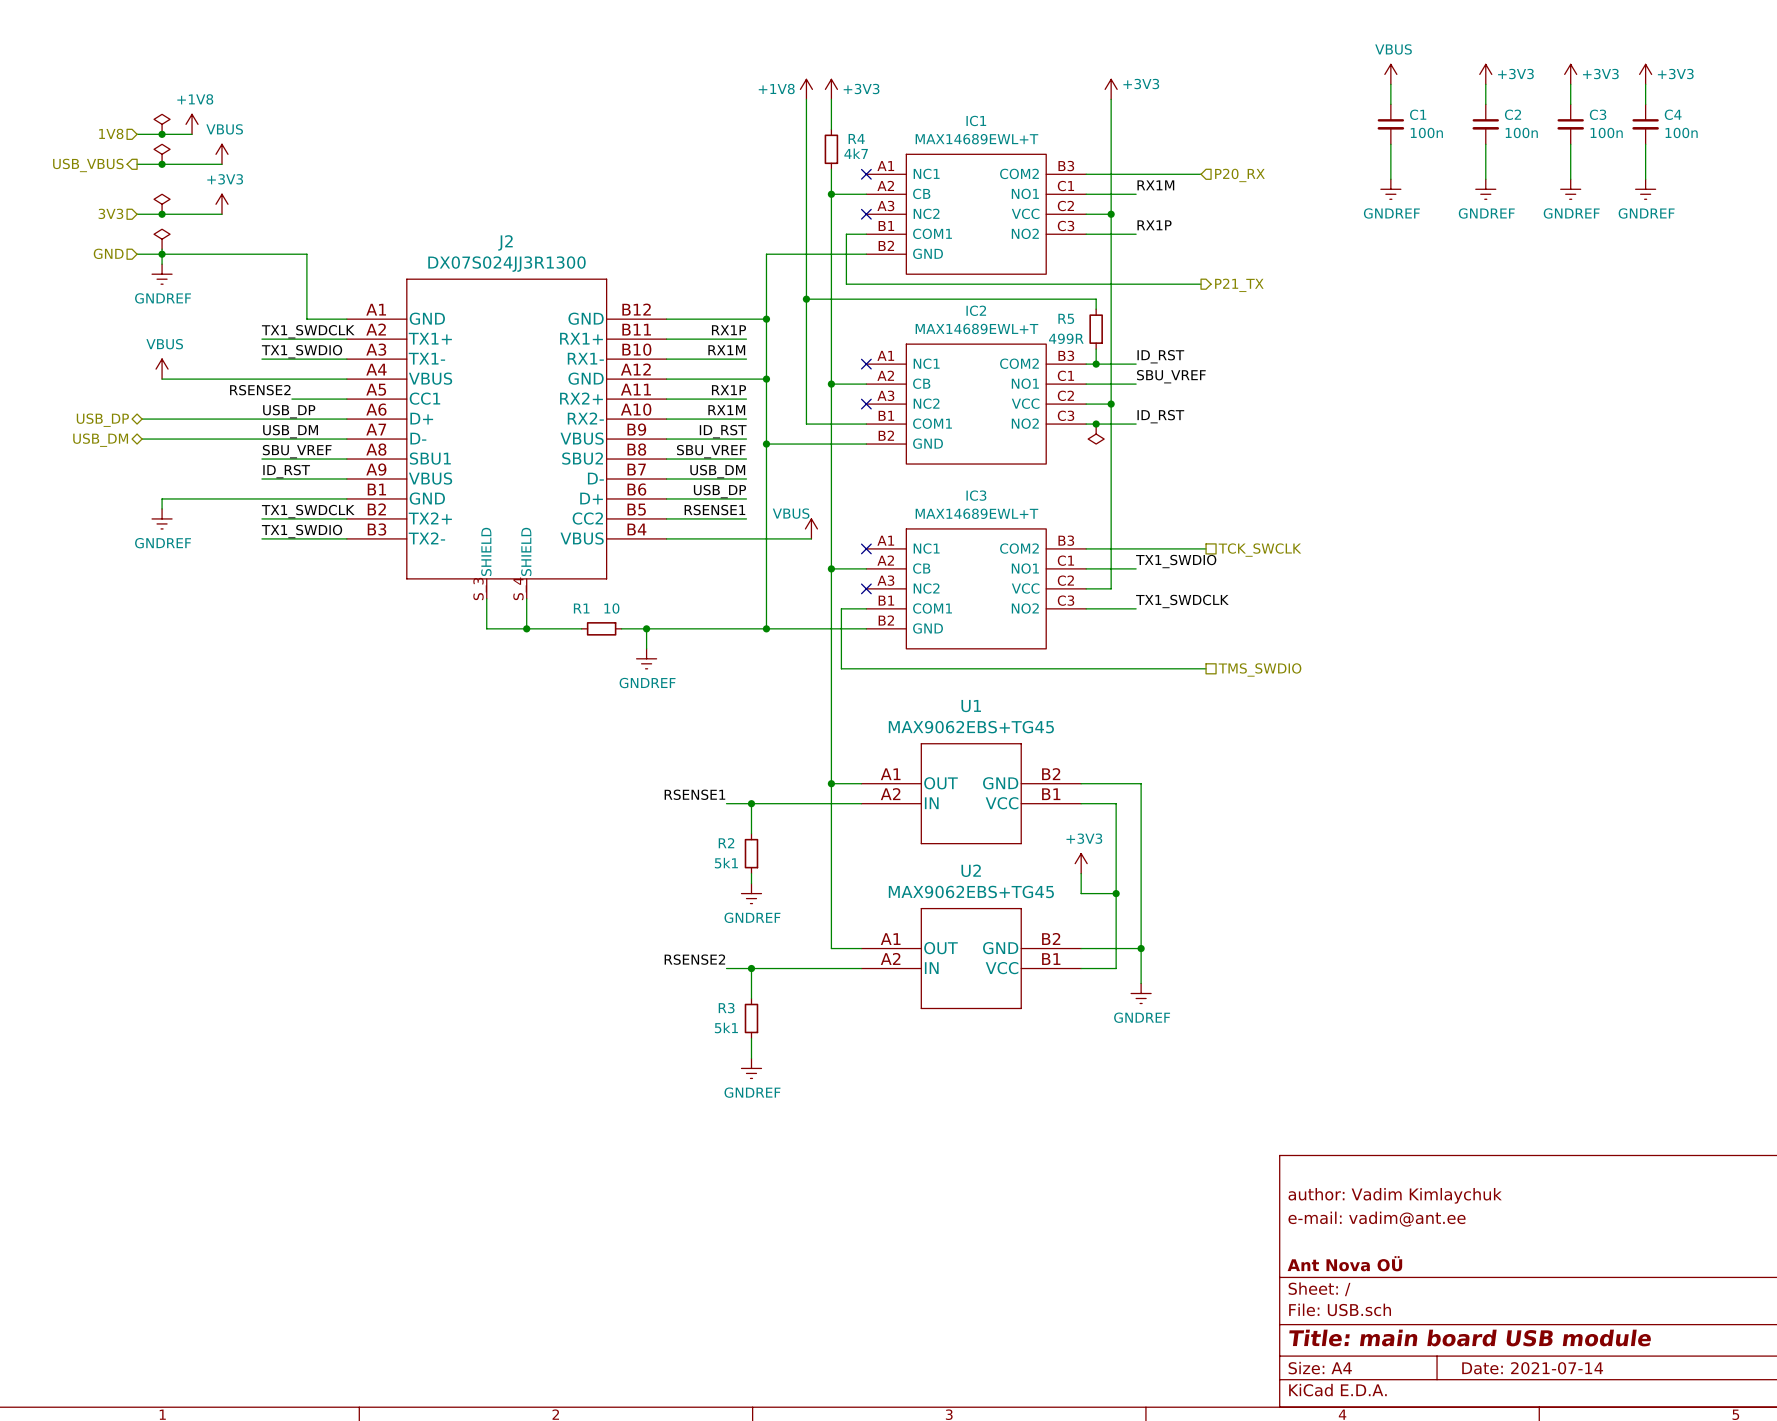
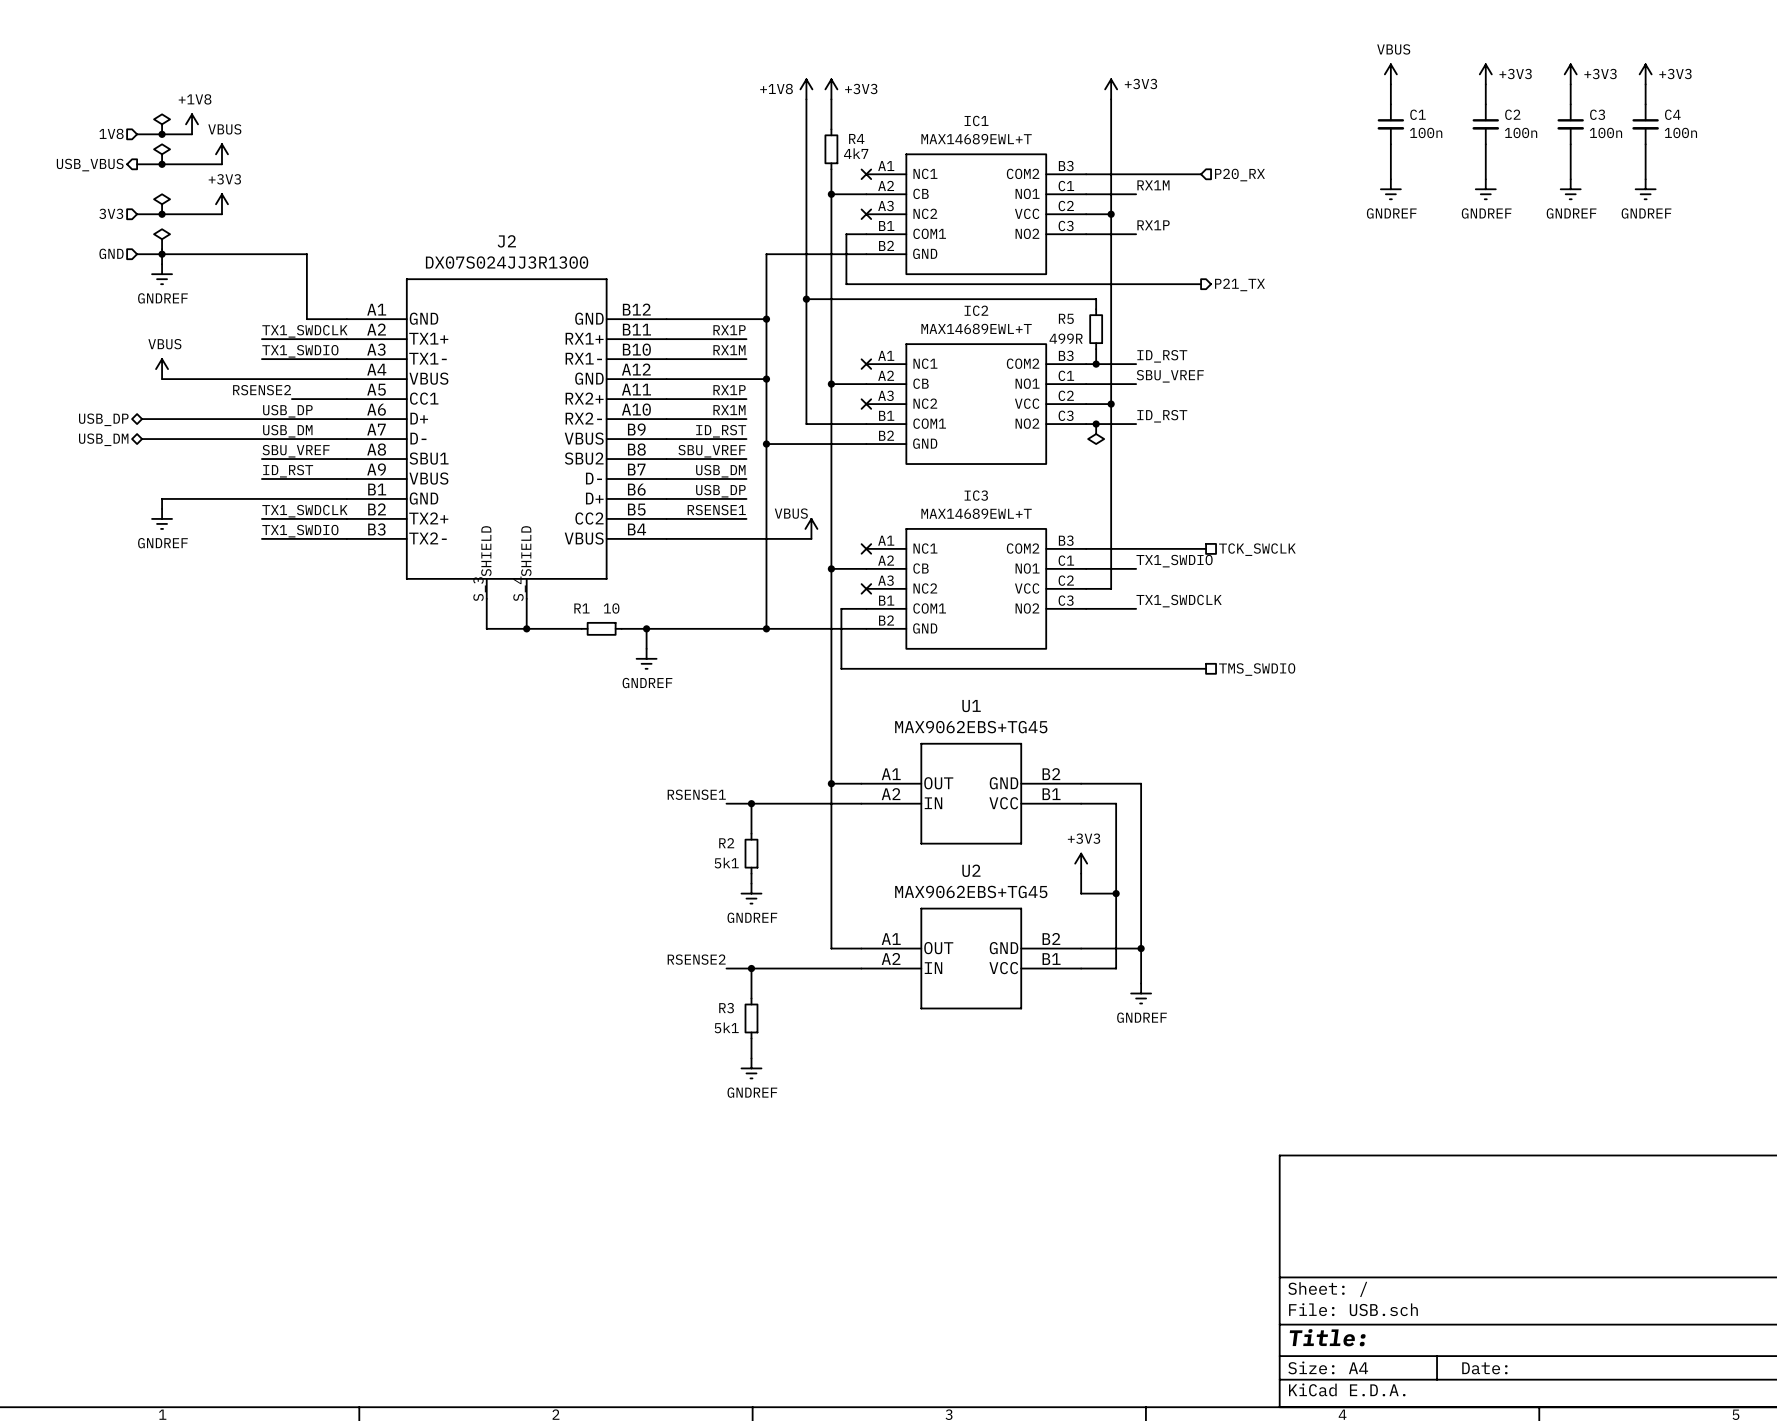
title block: author: Vadim Kimlaychuk (1395, 1195) -> none
title block: e-mail: vadim@ant.ee (1377, 1219) -> none
title block: Ant Nova OÜ (1344, 1263) -> none
title block: Title: main board USB module (1470, 1338) -> Title: (1327, 1337)
title block: Date: 2021-07-14 (1532, 1368) -> Date: (1484, 1368)

